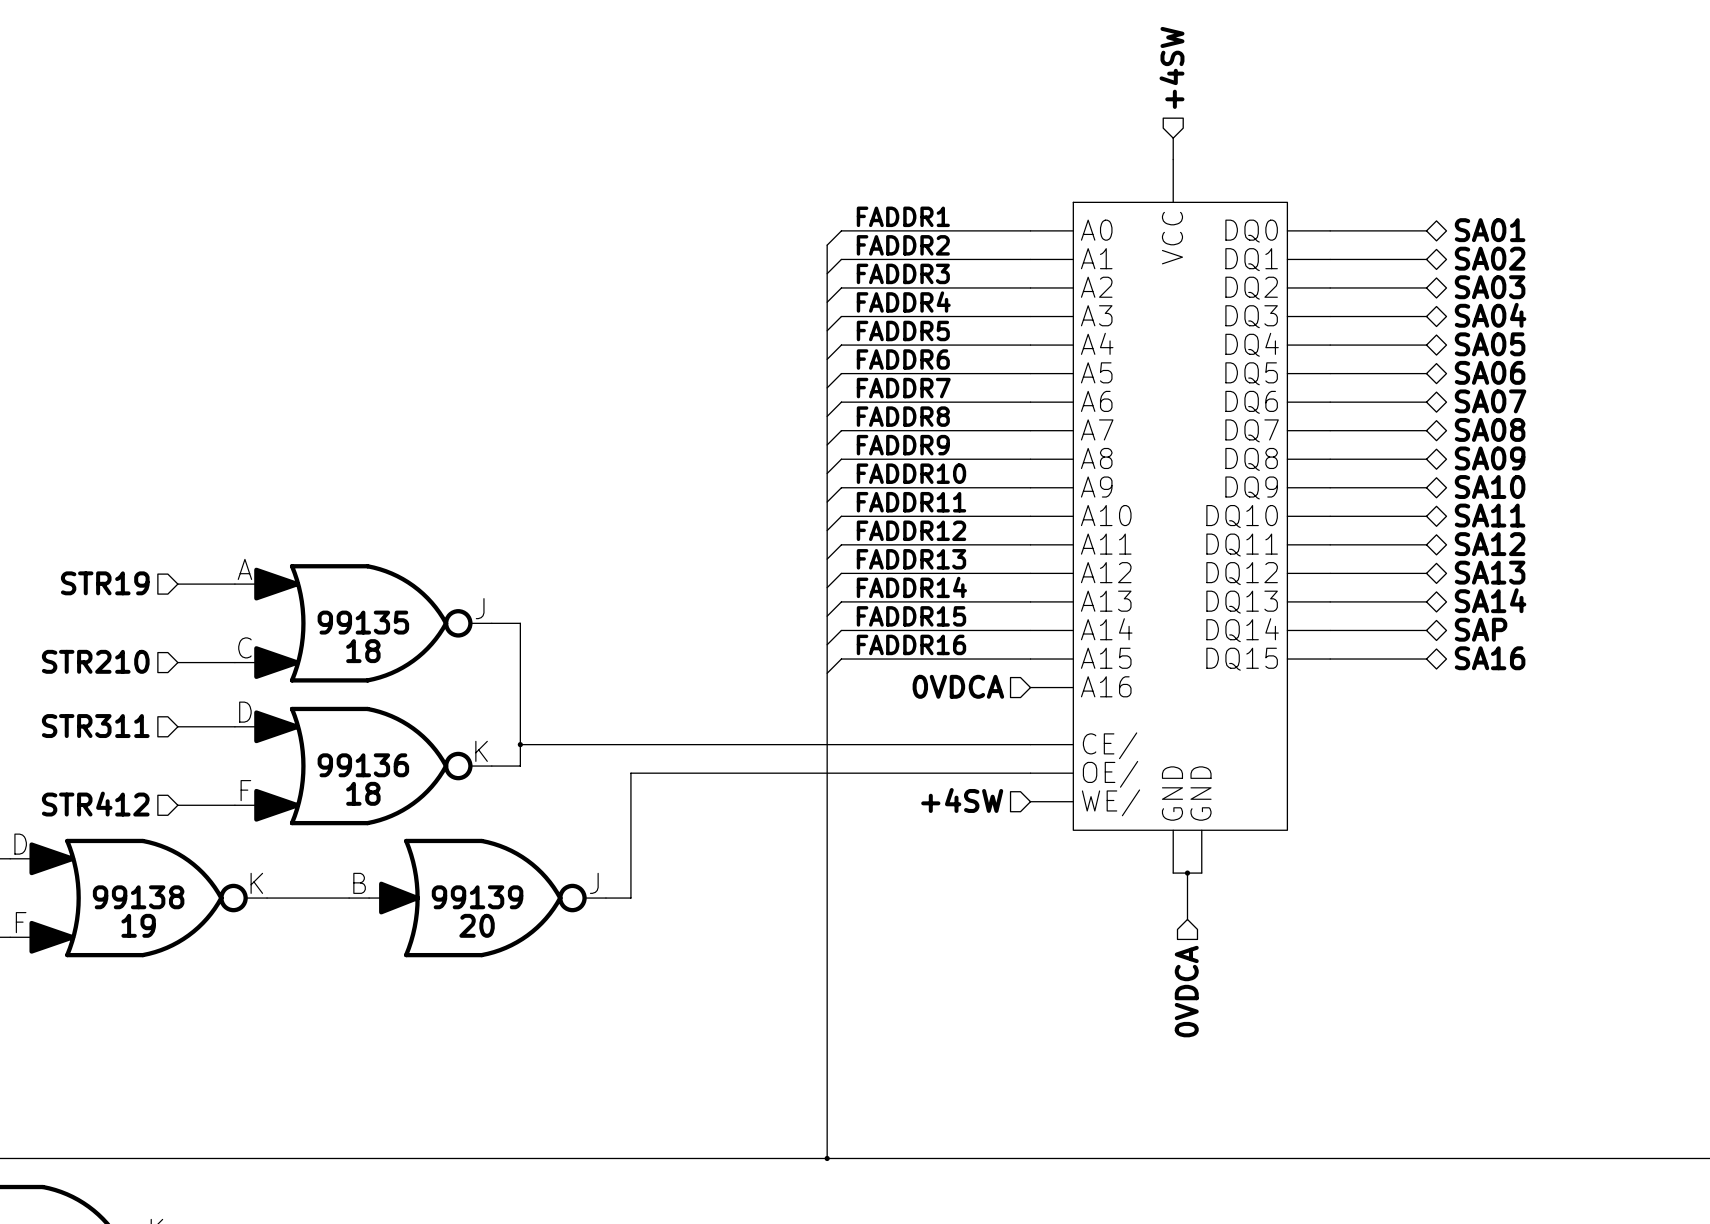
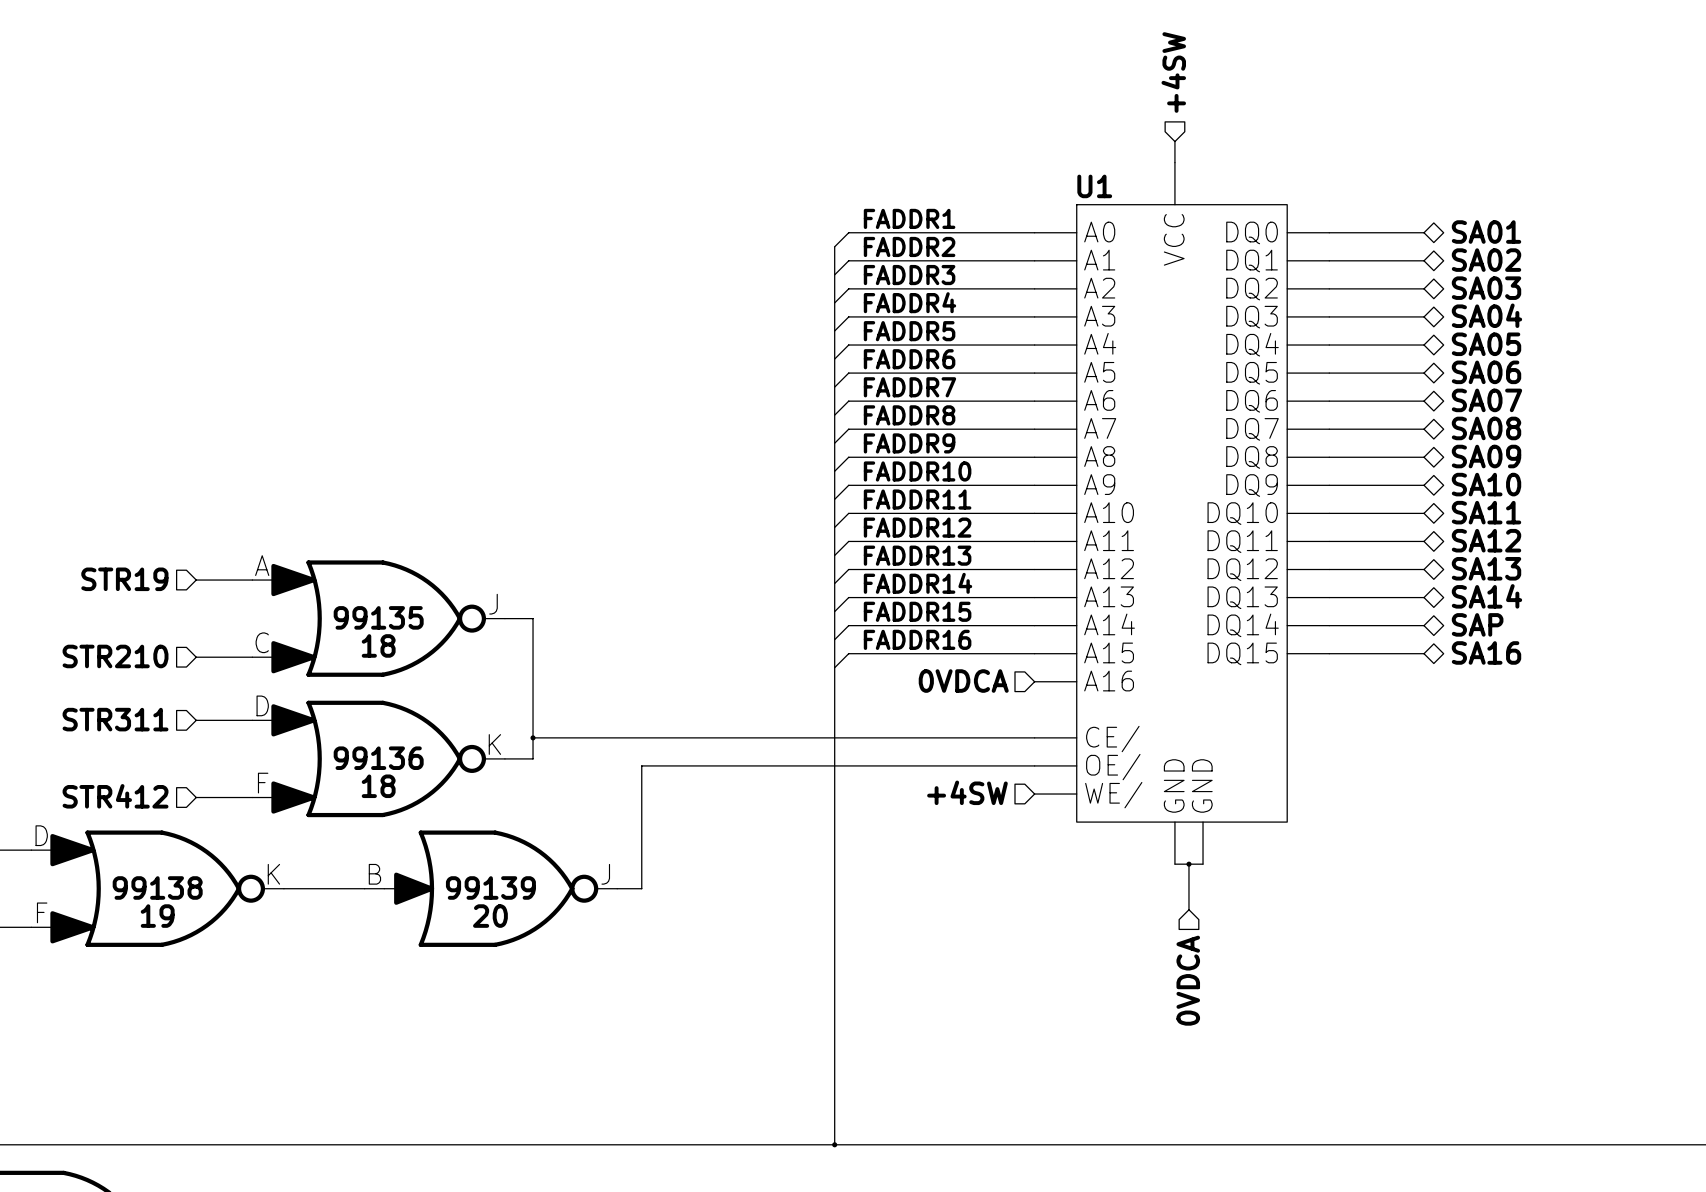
U1 name: none -> U1 (1094, 186)

